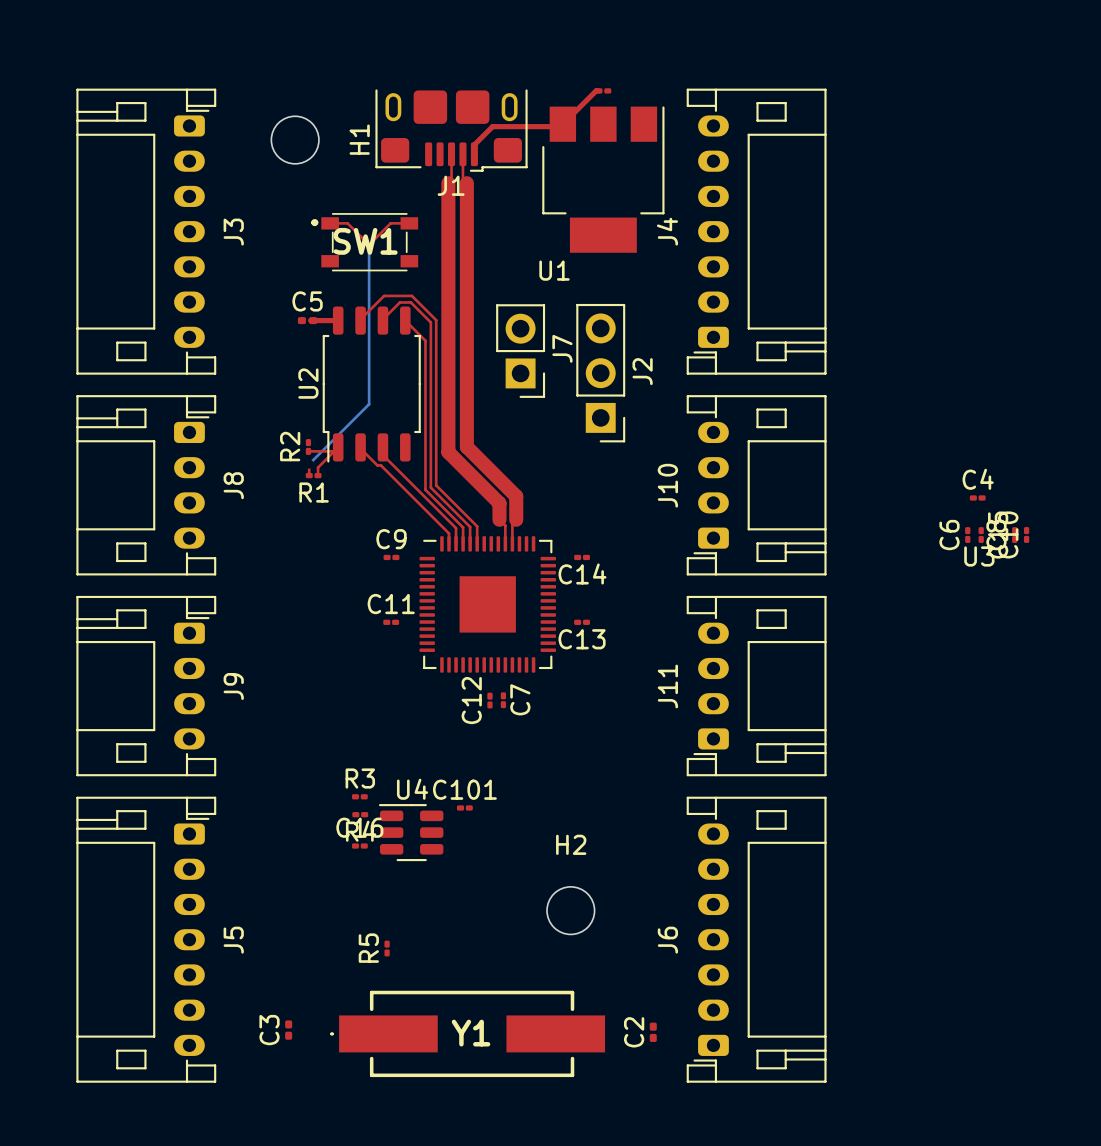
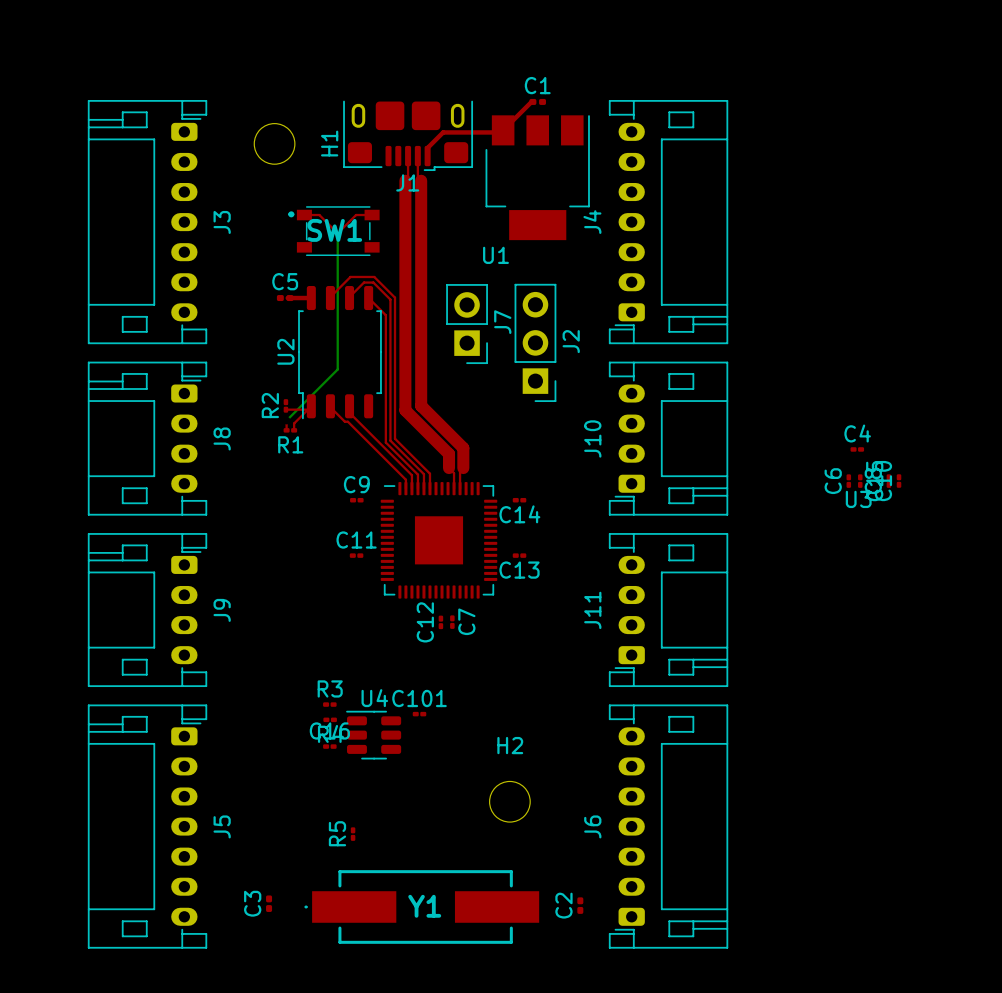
part: (603, 90) -> none
C1: none -> (537, 101)

